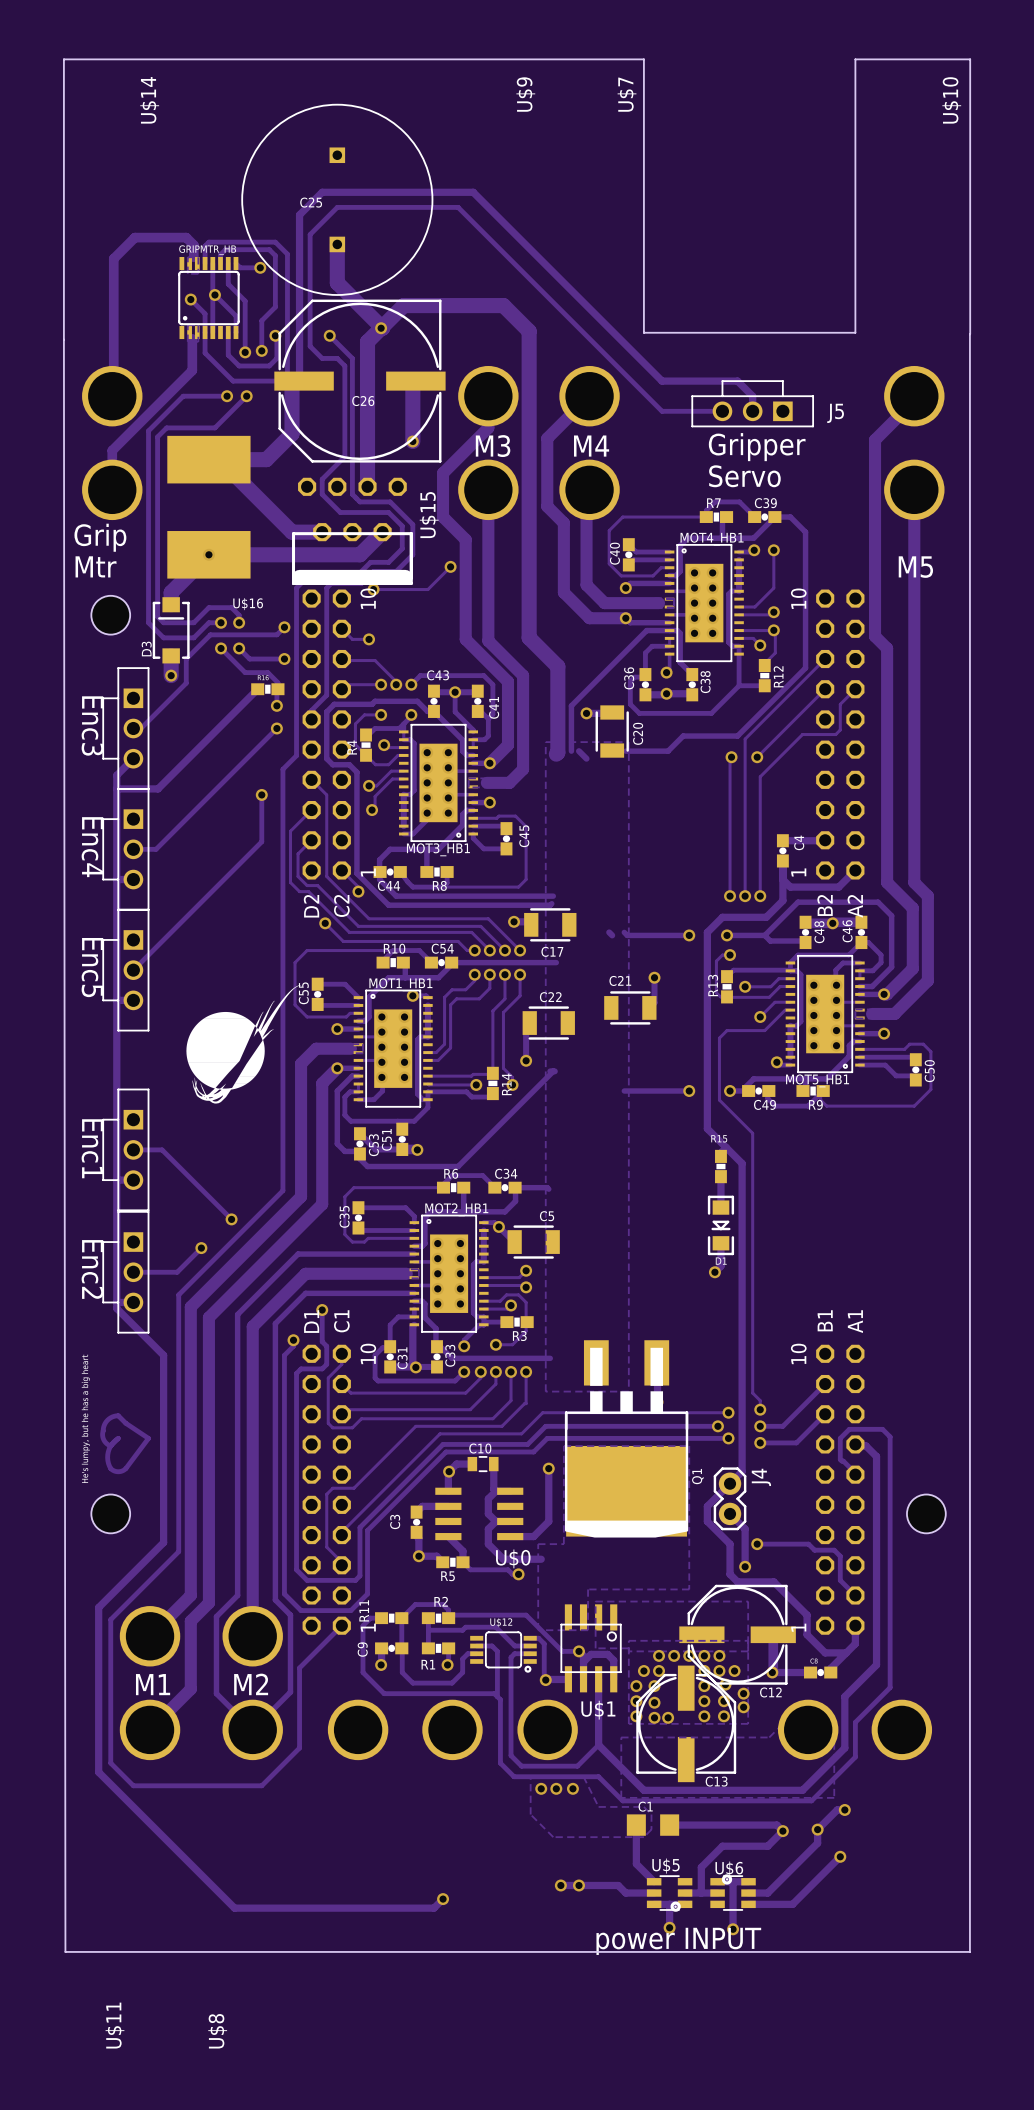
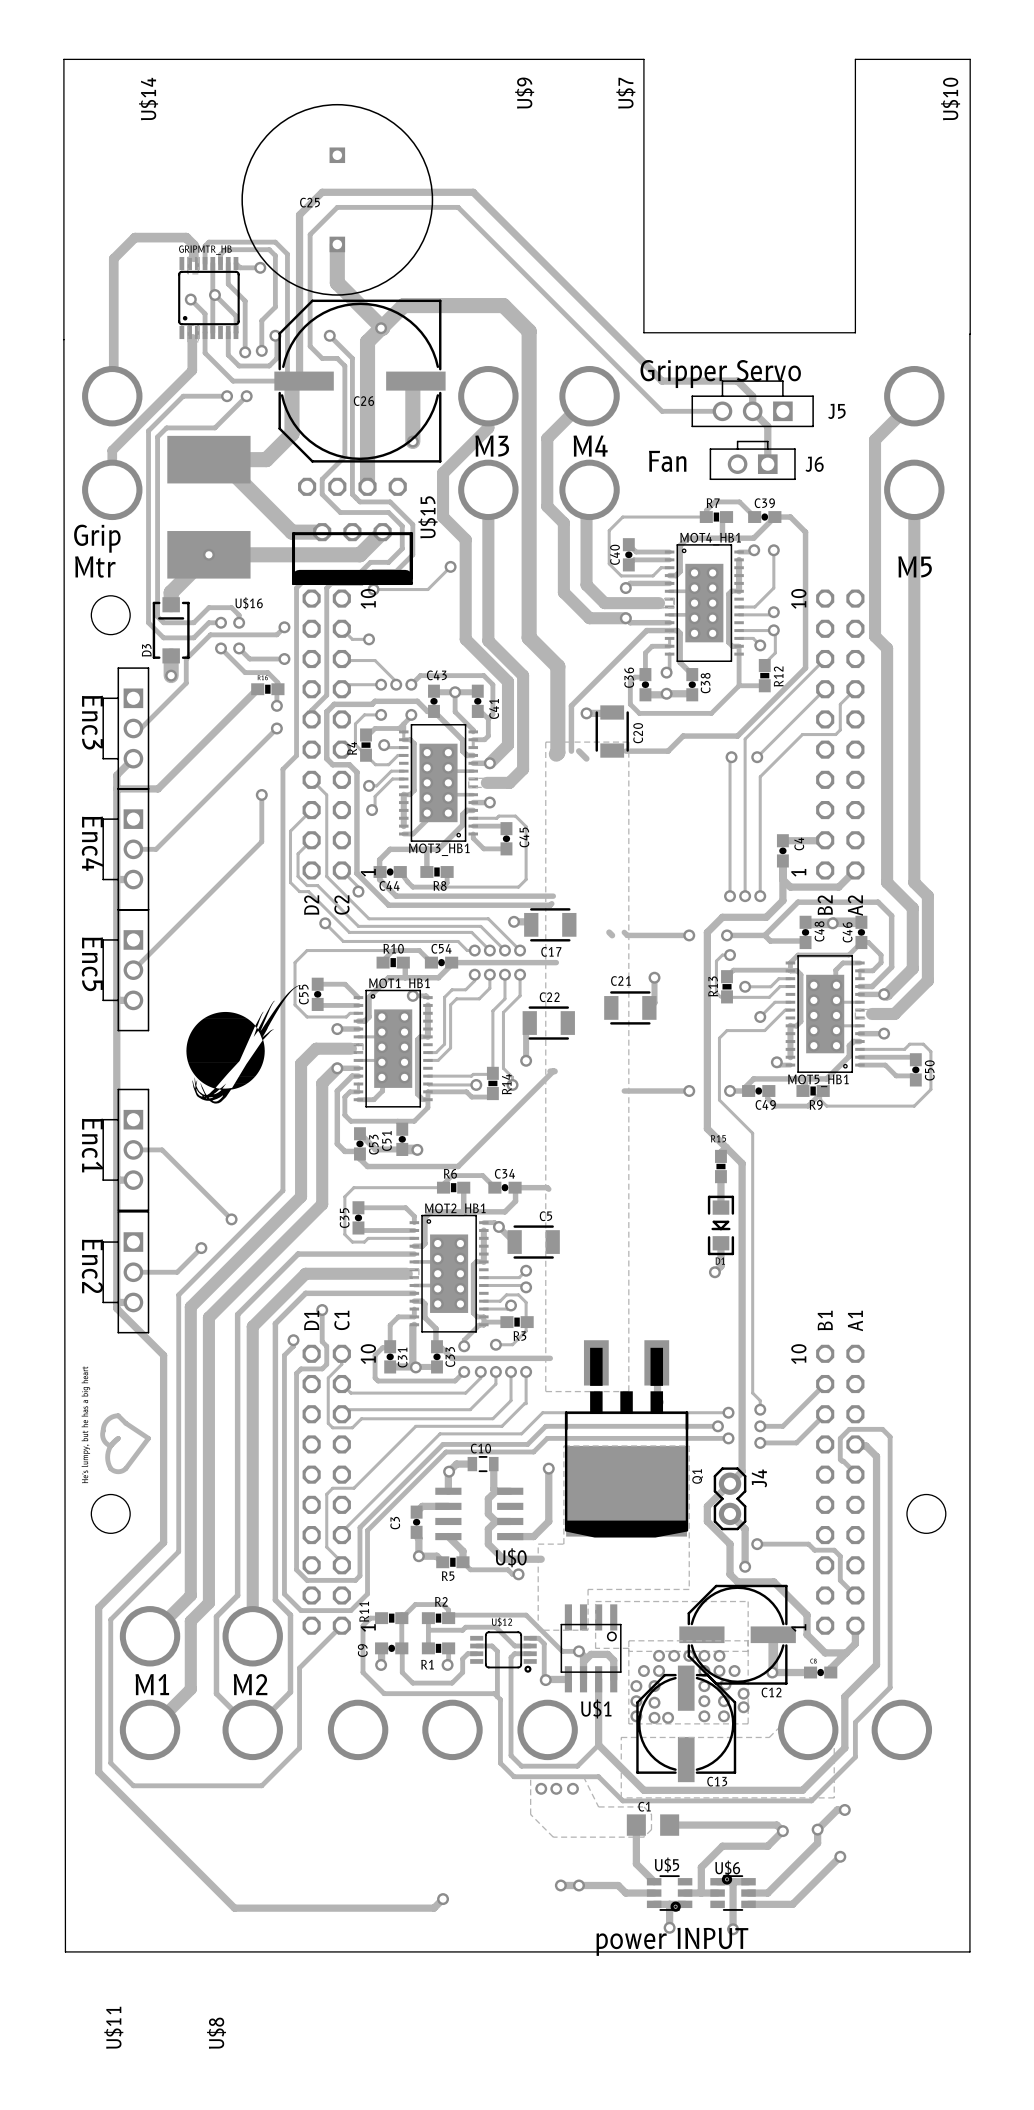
text: none -> Gripper Servo (720, 374)
track: none -> (752, 411) (767, 426) (767, 464)
text: Gripper (757, 447) -> none
J6: none -> (752, 460)
text: none -> Fan (667, 461)
text: Servo (744, 476) -> none

